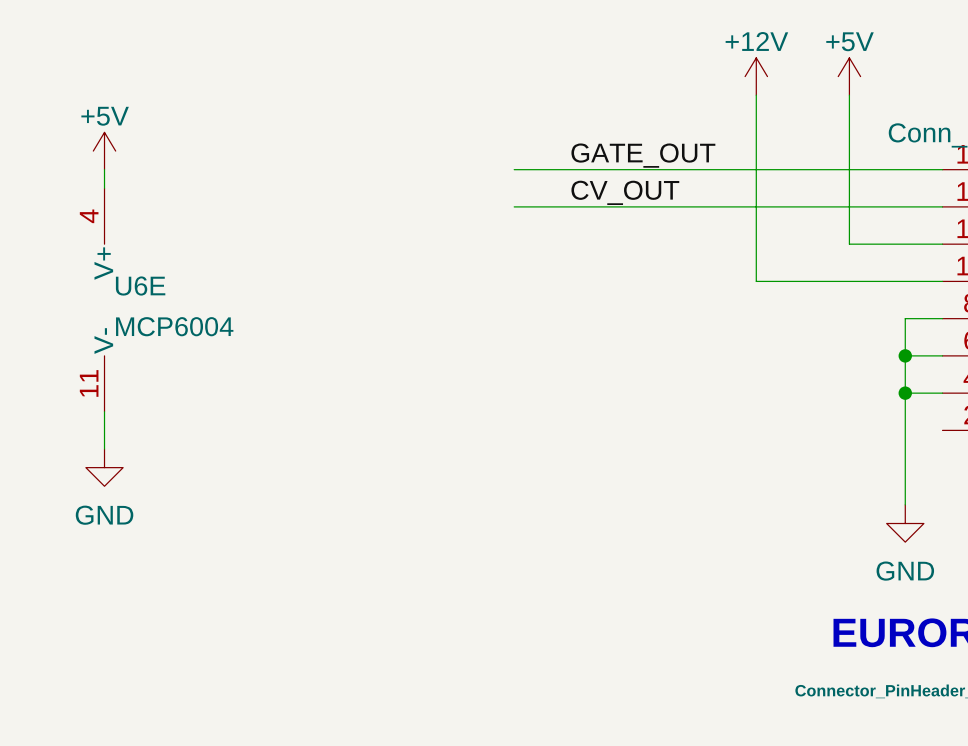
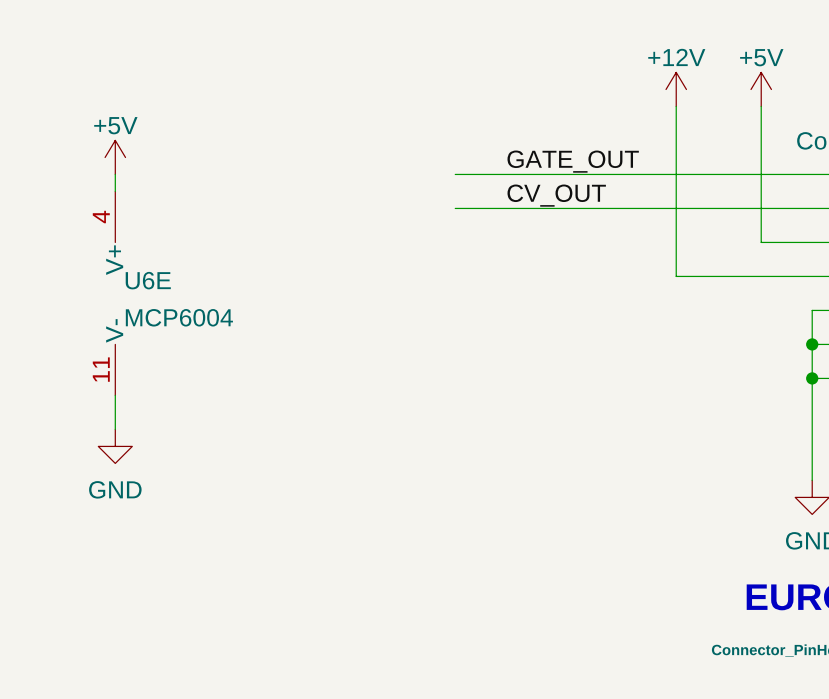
power symbol position: +5V (104, 151) -> +5V (115, 157)
wire: (104, 169) (104, 188) -> (115, 174) (115, 191)
U6E position: (104, 300) -> (115, 293)
wire: (104, 411) (104, 449) -> (115, 395) (115, 429)
power symbol position: GND (104, 467) -> GND (115, 446)

